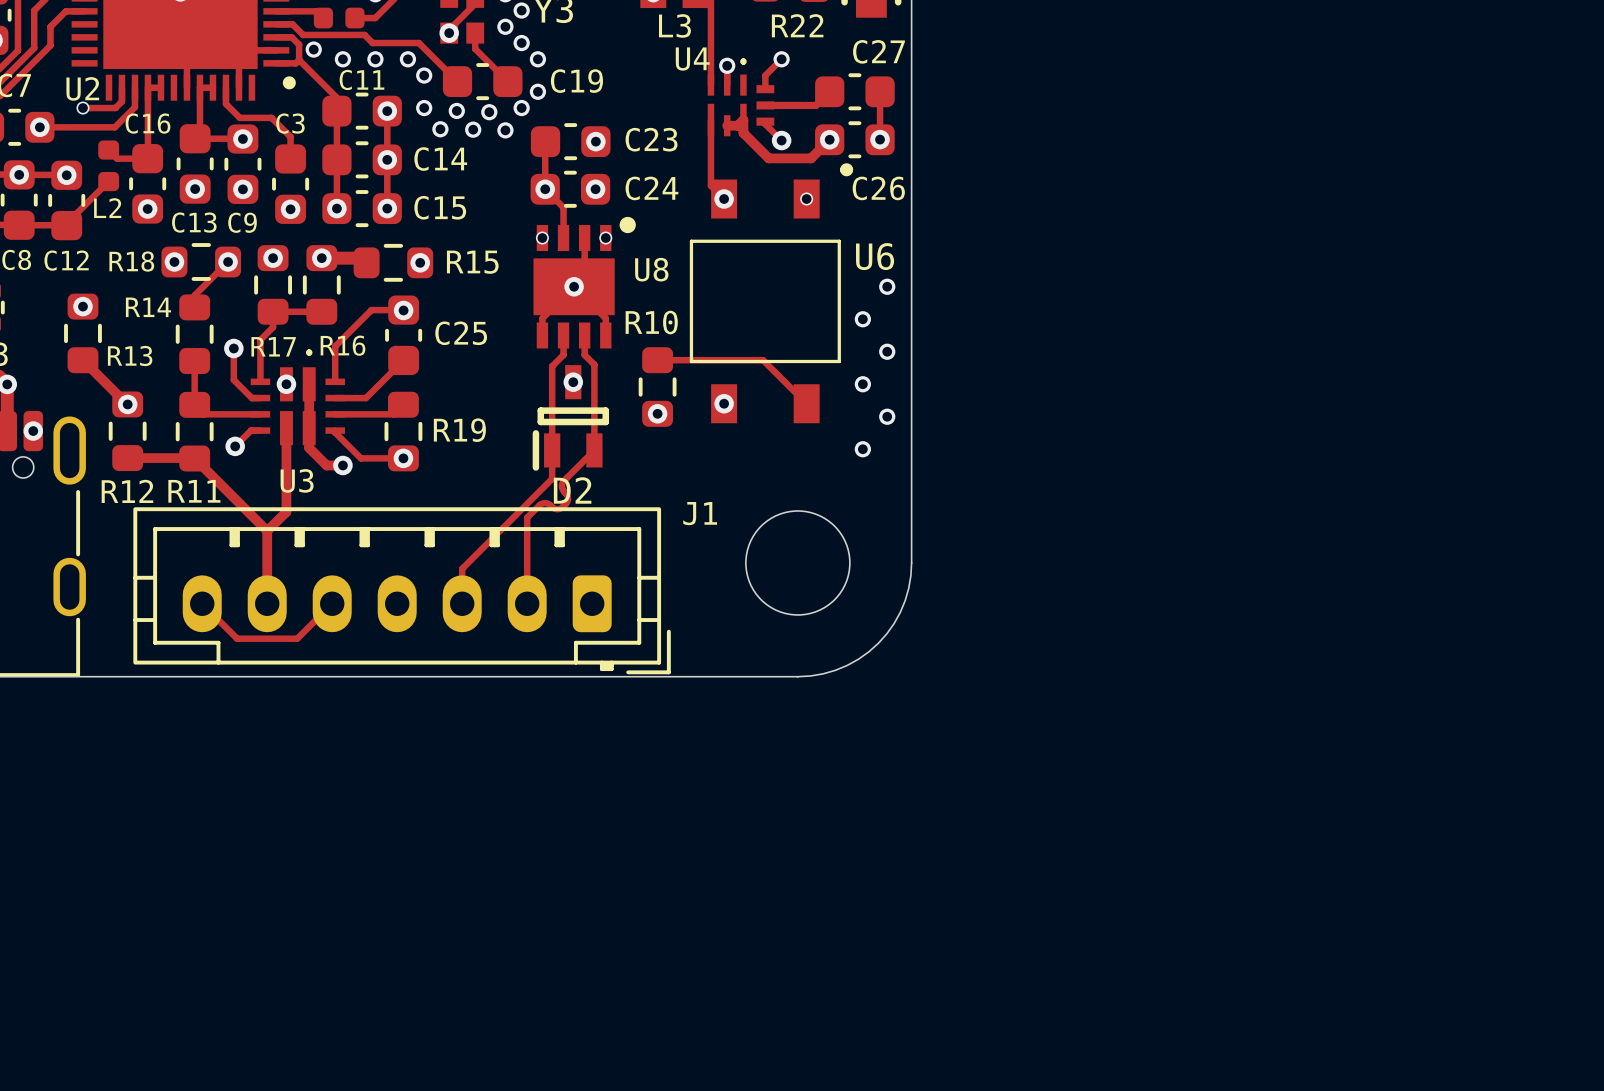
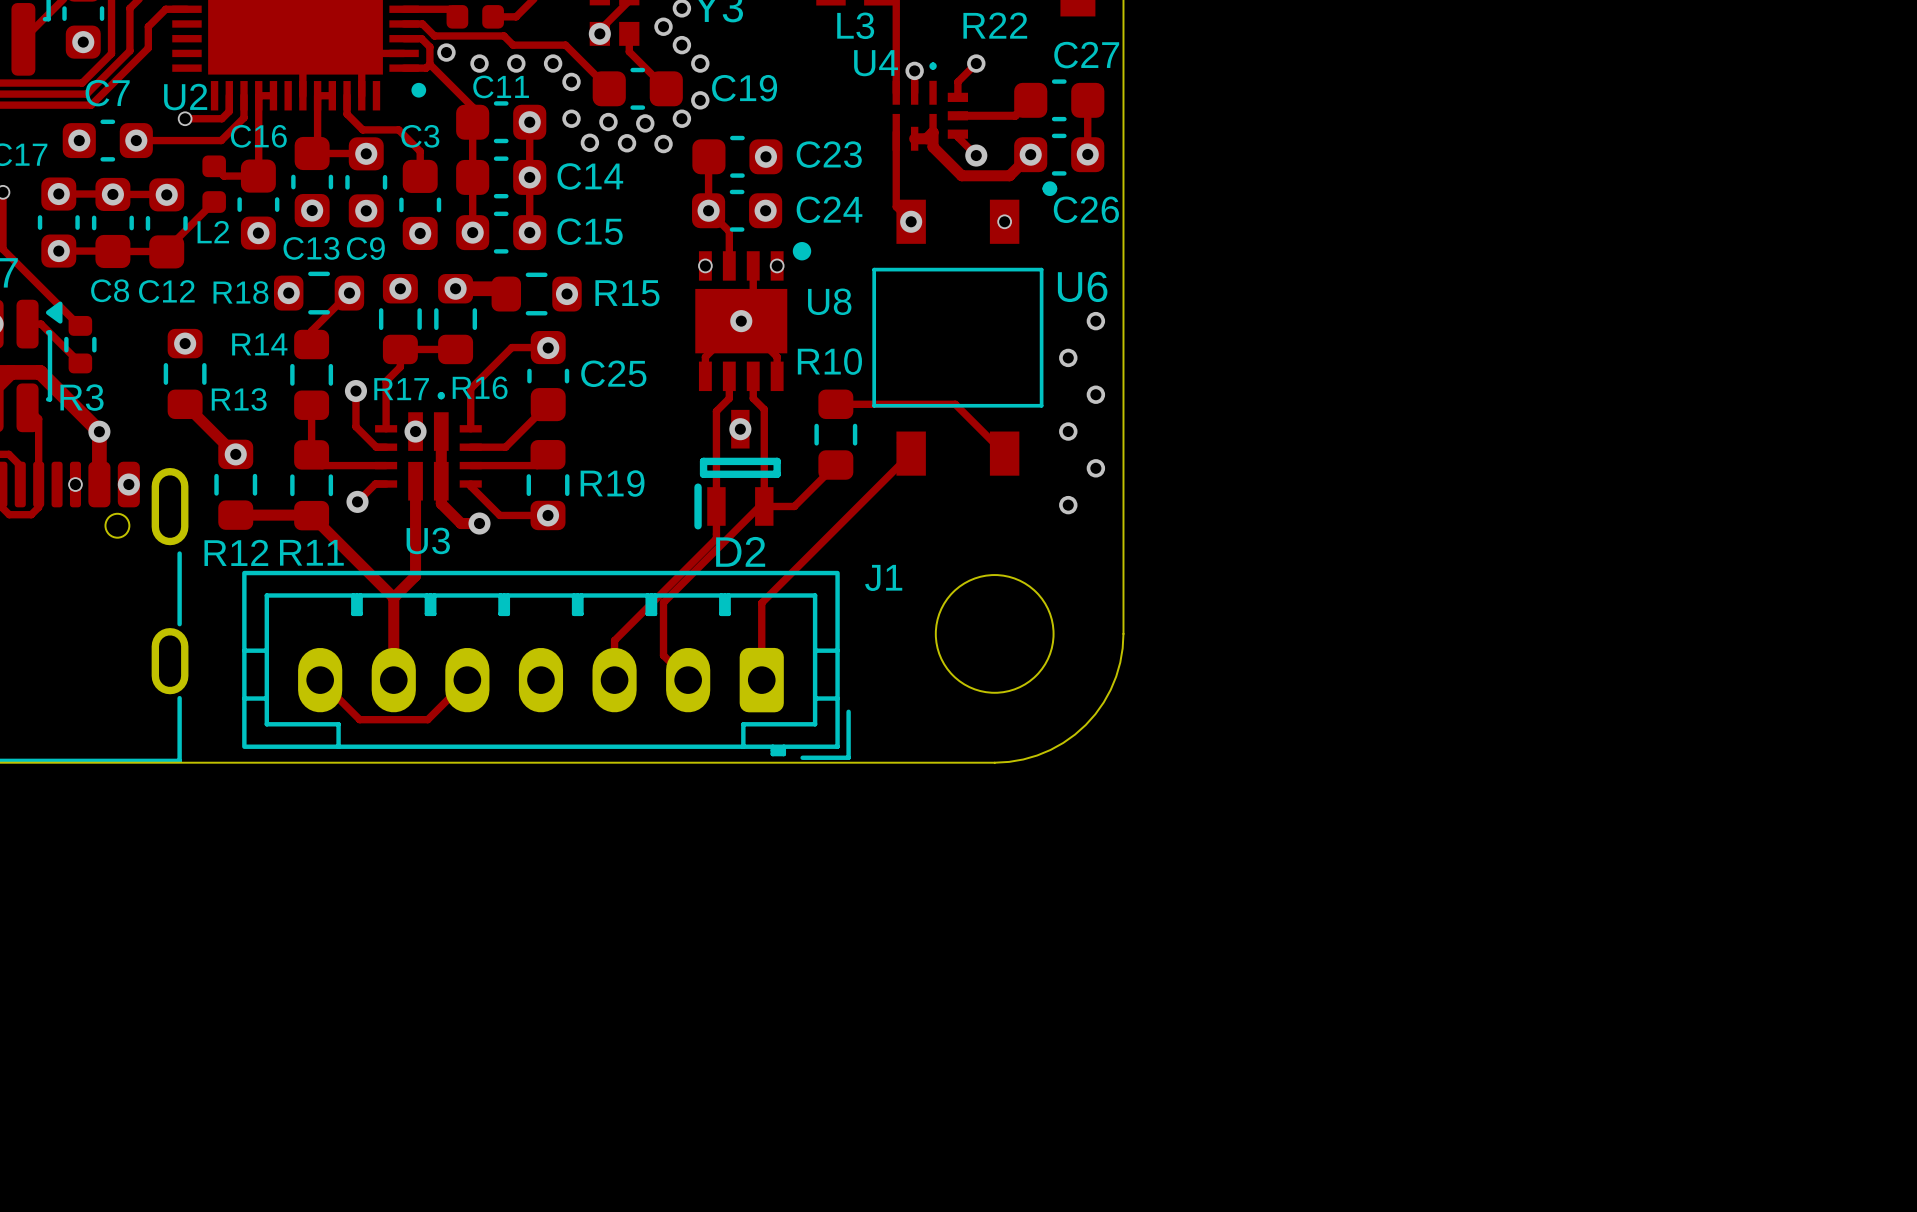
track: none -> (900, 442) (911, 453) (761, 603) (761, 680)
via: (724, 403) -> none
via: (657, 413) -> none
track: (594, 450) (563, 481) (562, 488) (567, 498) (562, 506) (556, 509) (547, 503) (542, 503) (527, 517) (527, 603) -> (835, 465) (794, 506) (759, 506) (663, 602) (663, 655) (688, 680)

